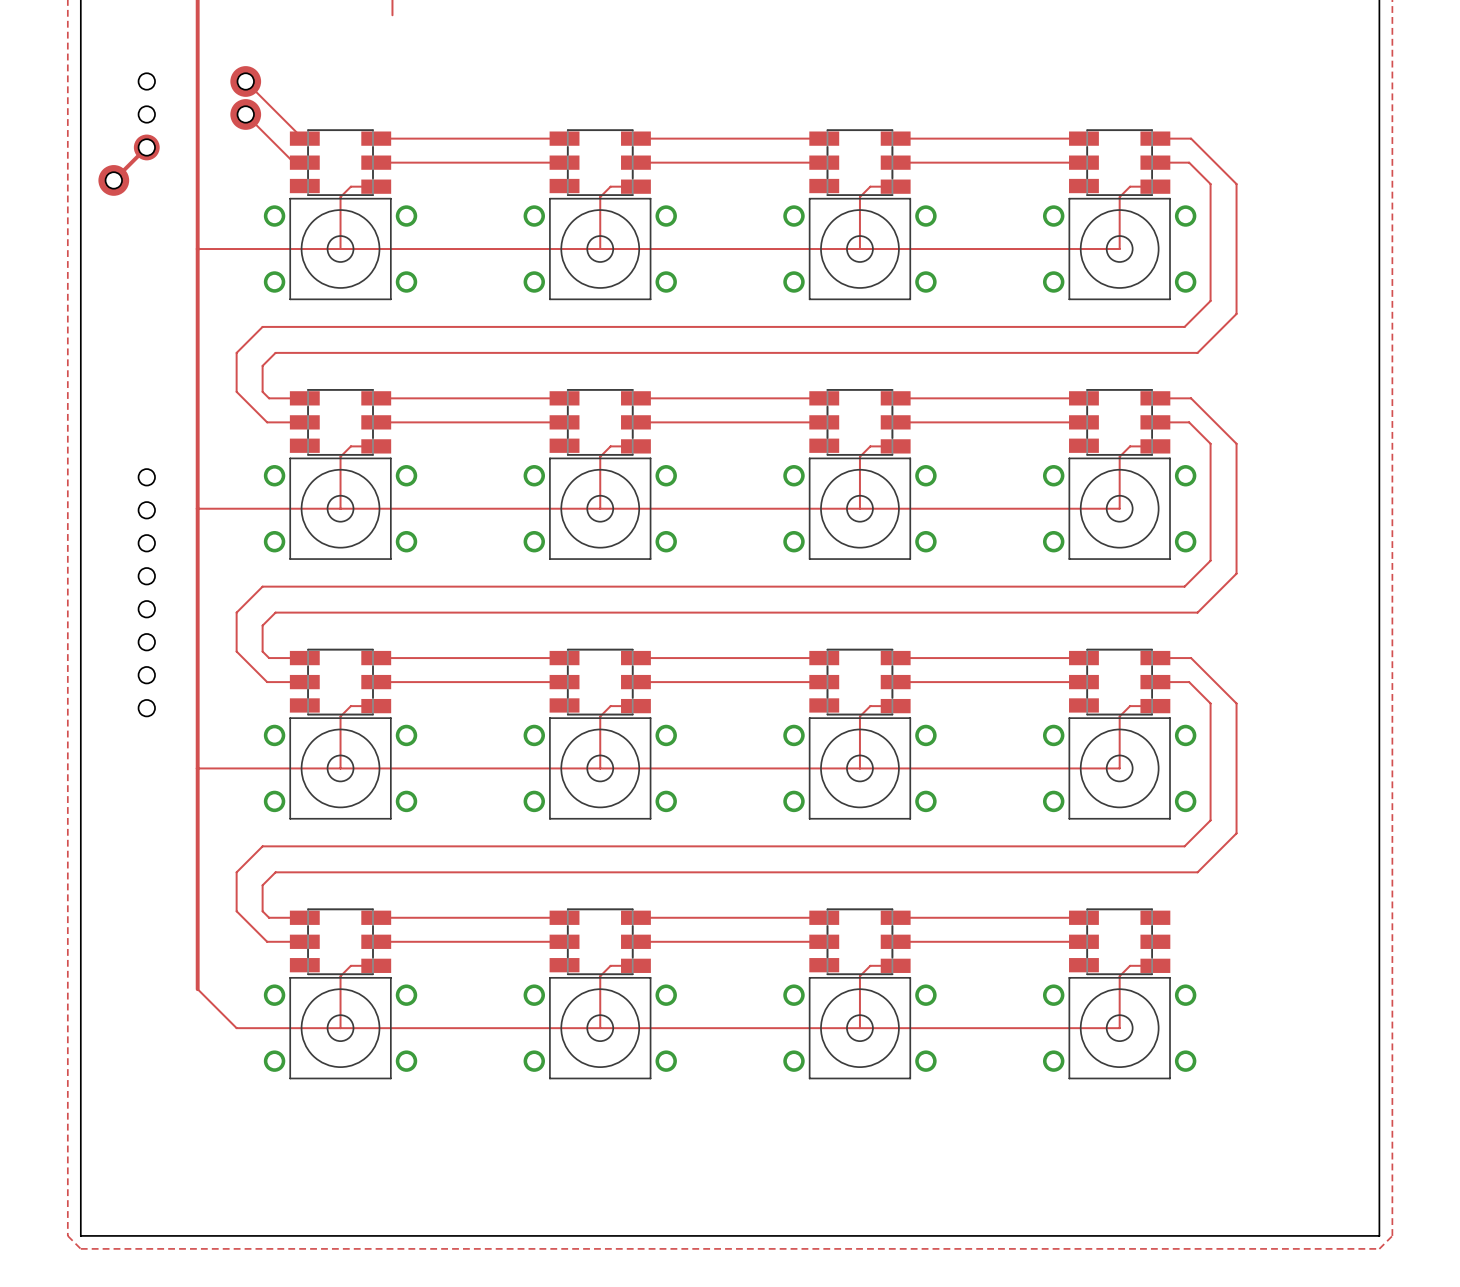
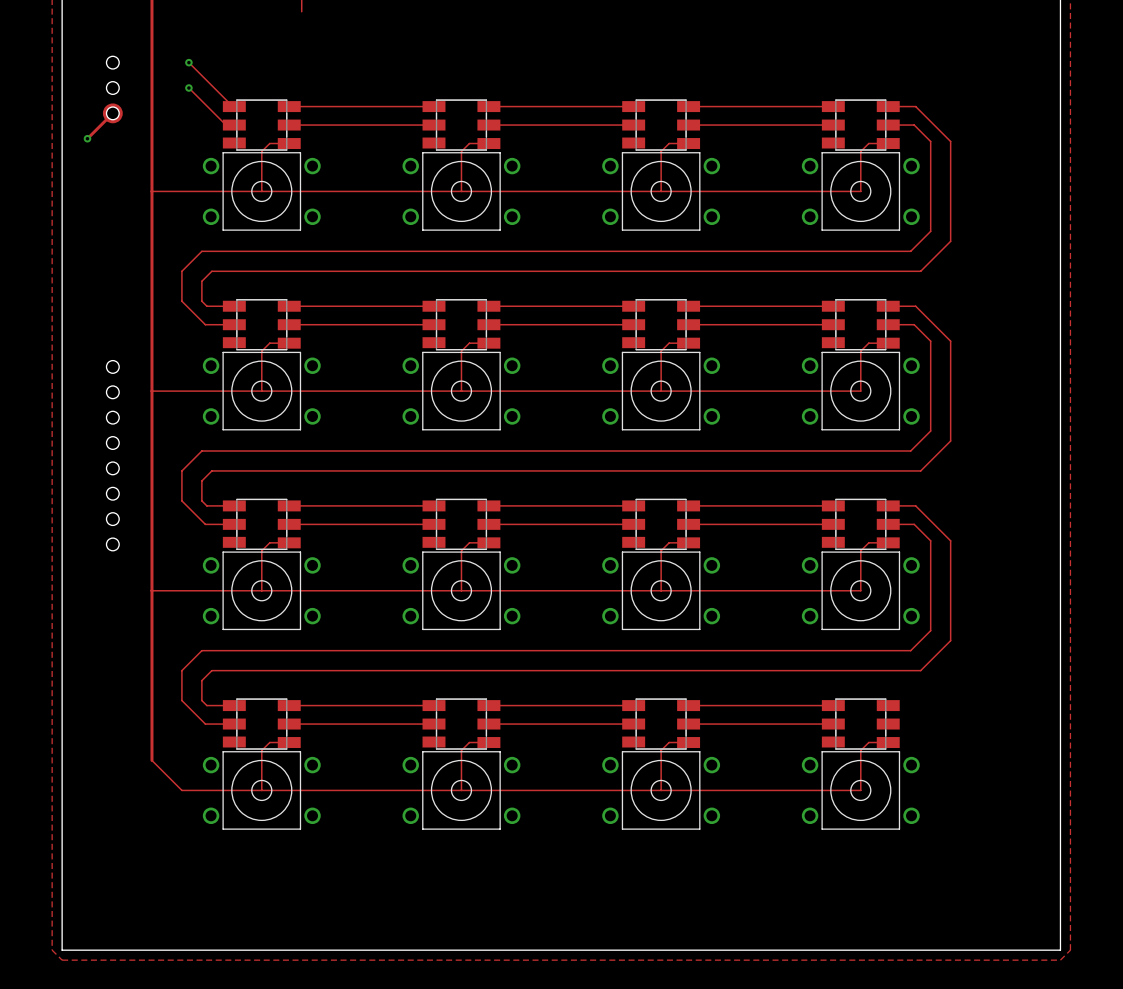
drawing: [230, 66, 262, 130] -> none
hole: (245, 81) -> none
hole: (245, 114) -> none
drawing: [98, 165, 130, 196] -> none
hole: (113, 180) -> none

